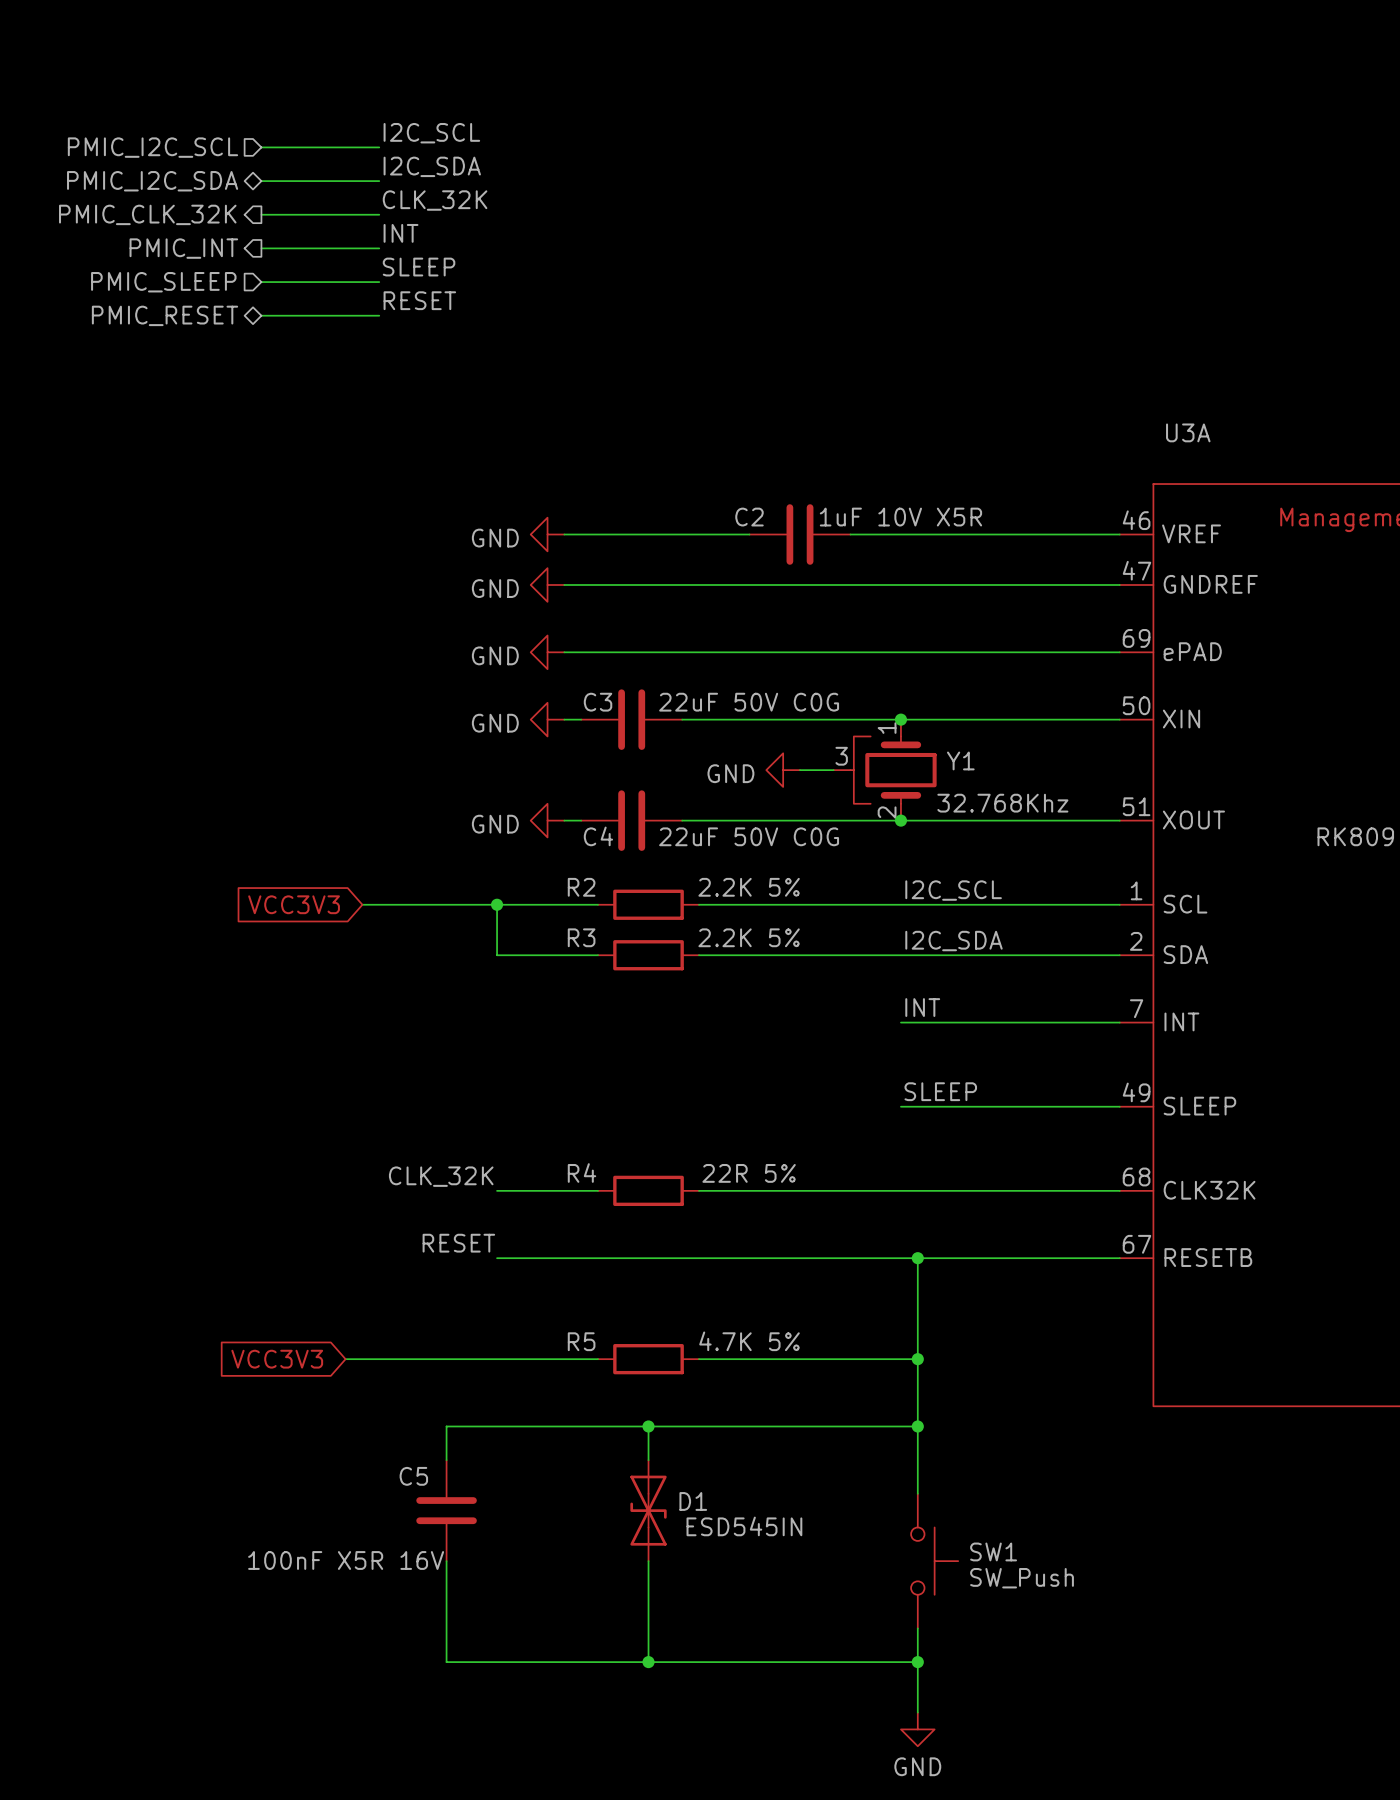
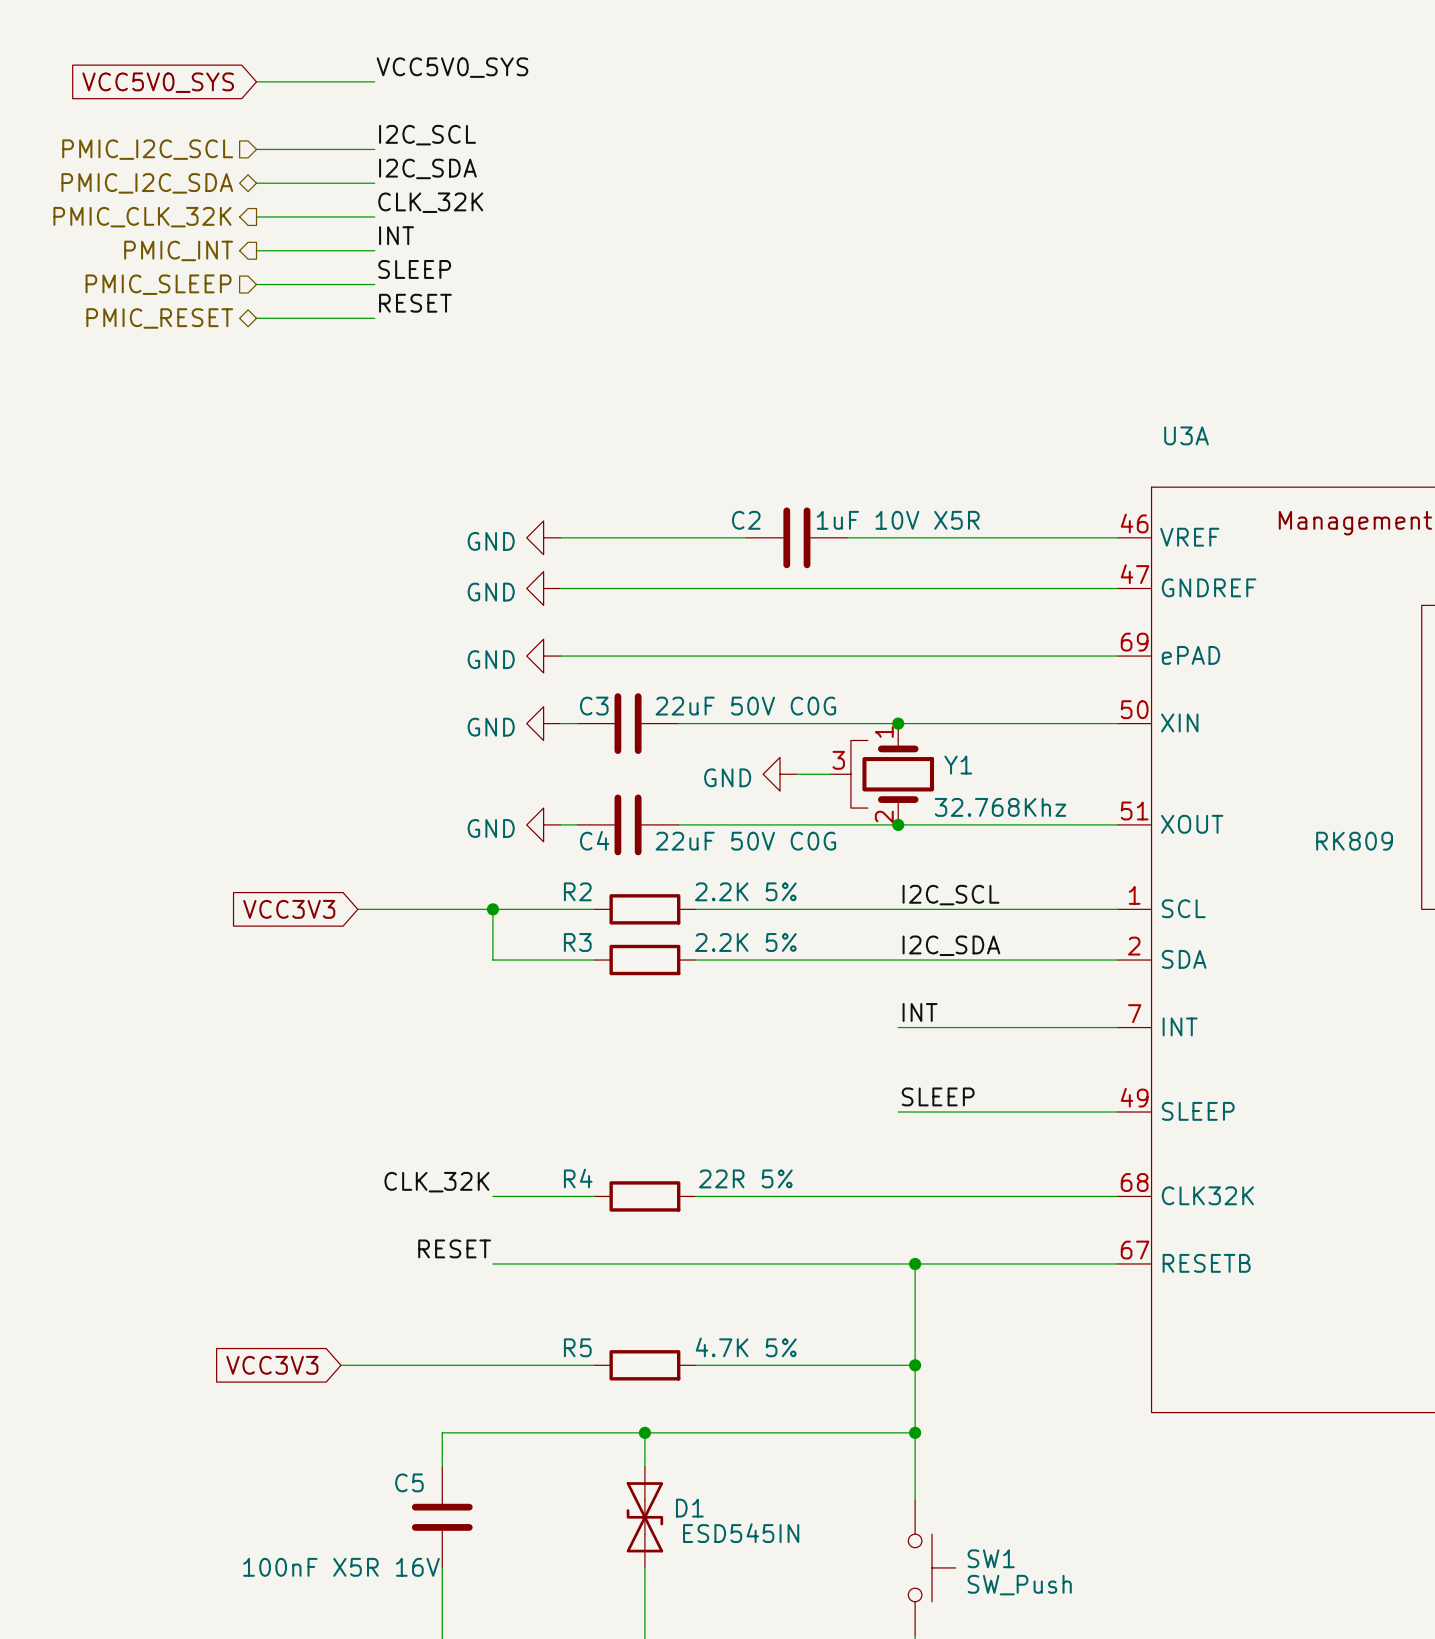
label: none -> VCC5V0_SYS (452, 67)
global label: none -> VCC5V0_SYS (158, 82)
wire: none -> (256, 81) (374, 81)

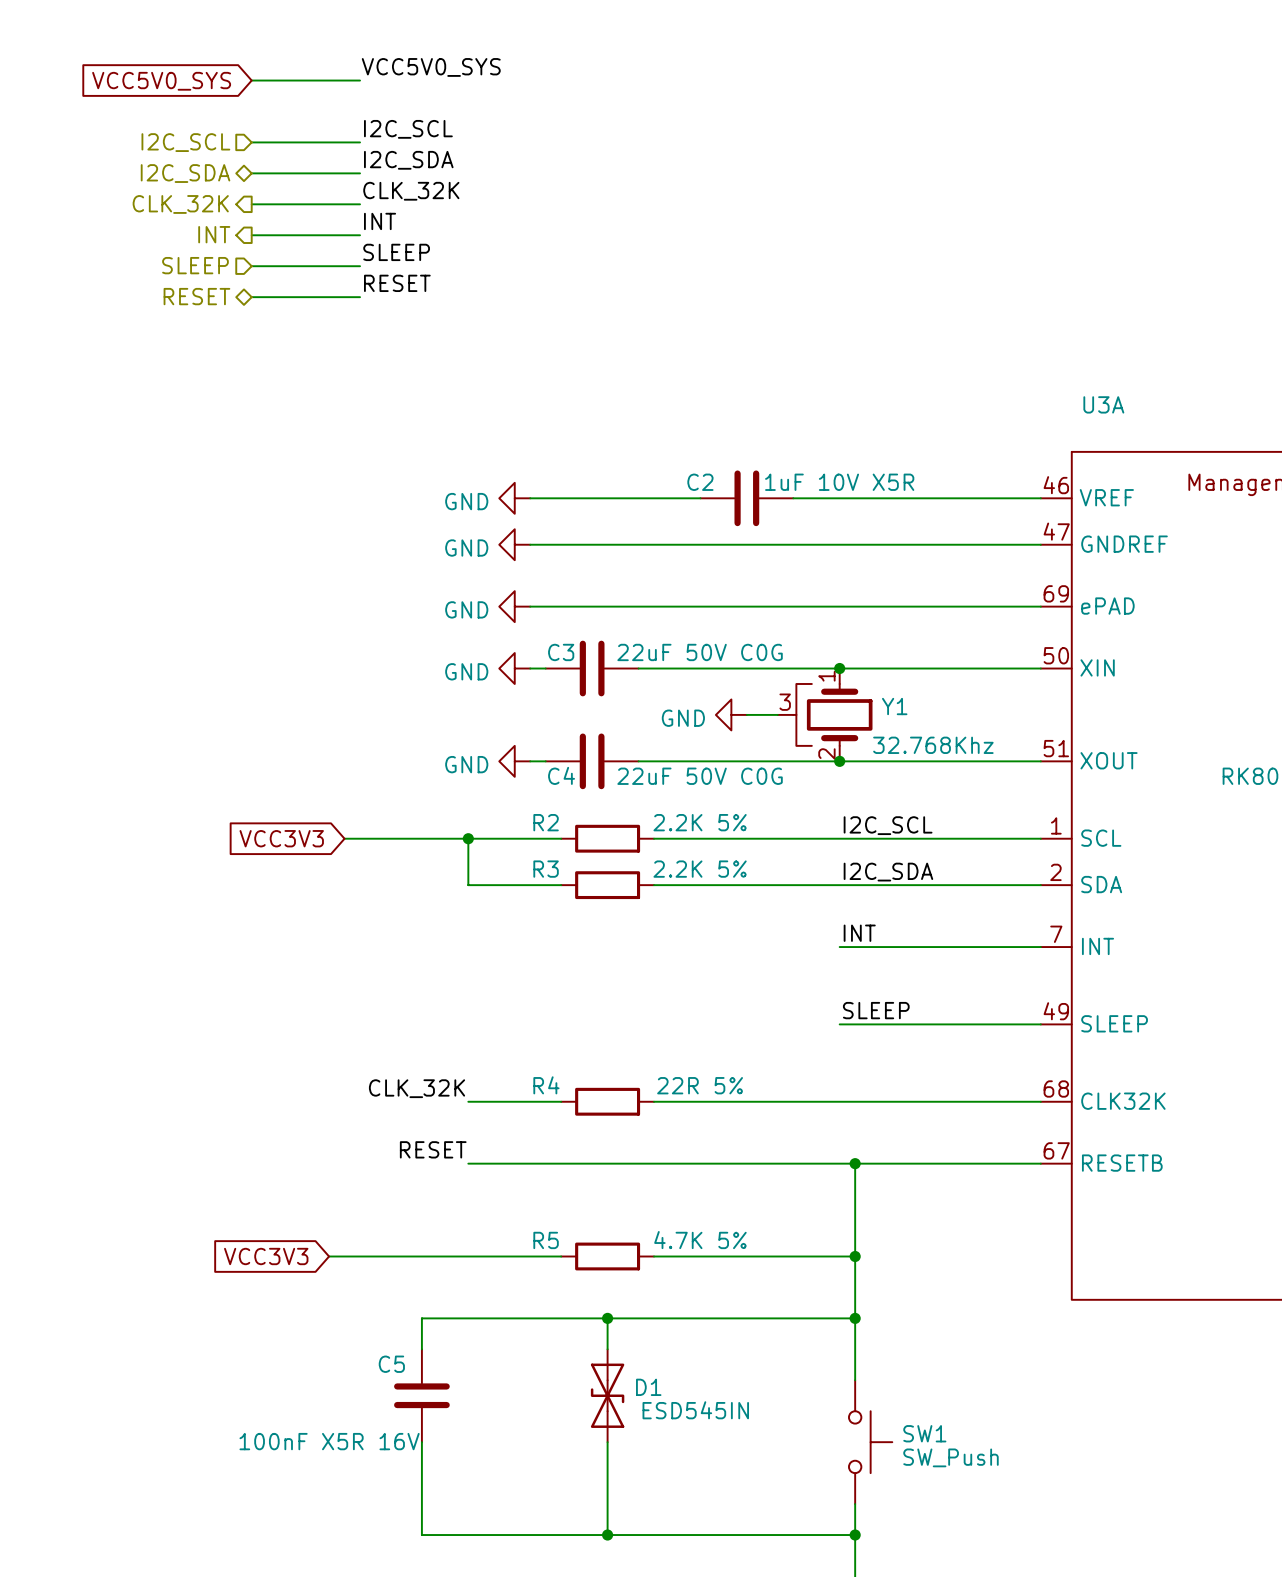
hierarchical label: PMIC_I2C_SCL (147, 149) -> I2C_SCL (185, 142)
hierarchical label: PMIC_I2C_SDA (147, 183) -> I2C_SDA (185, 173)
hierarchical label: PMIC_CLK_32K (142, 217) -> CLK_32K (180, 204)
hierarchical label: PMIC_INT (178, 250) -> INT (214, 234)
hierarchical label: PMIC_SLEEP (158, 284) -> SLEEP (195, 265)
hierarchical label: PMIC_RESET (159, 318) -> RESET (196, 296)

